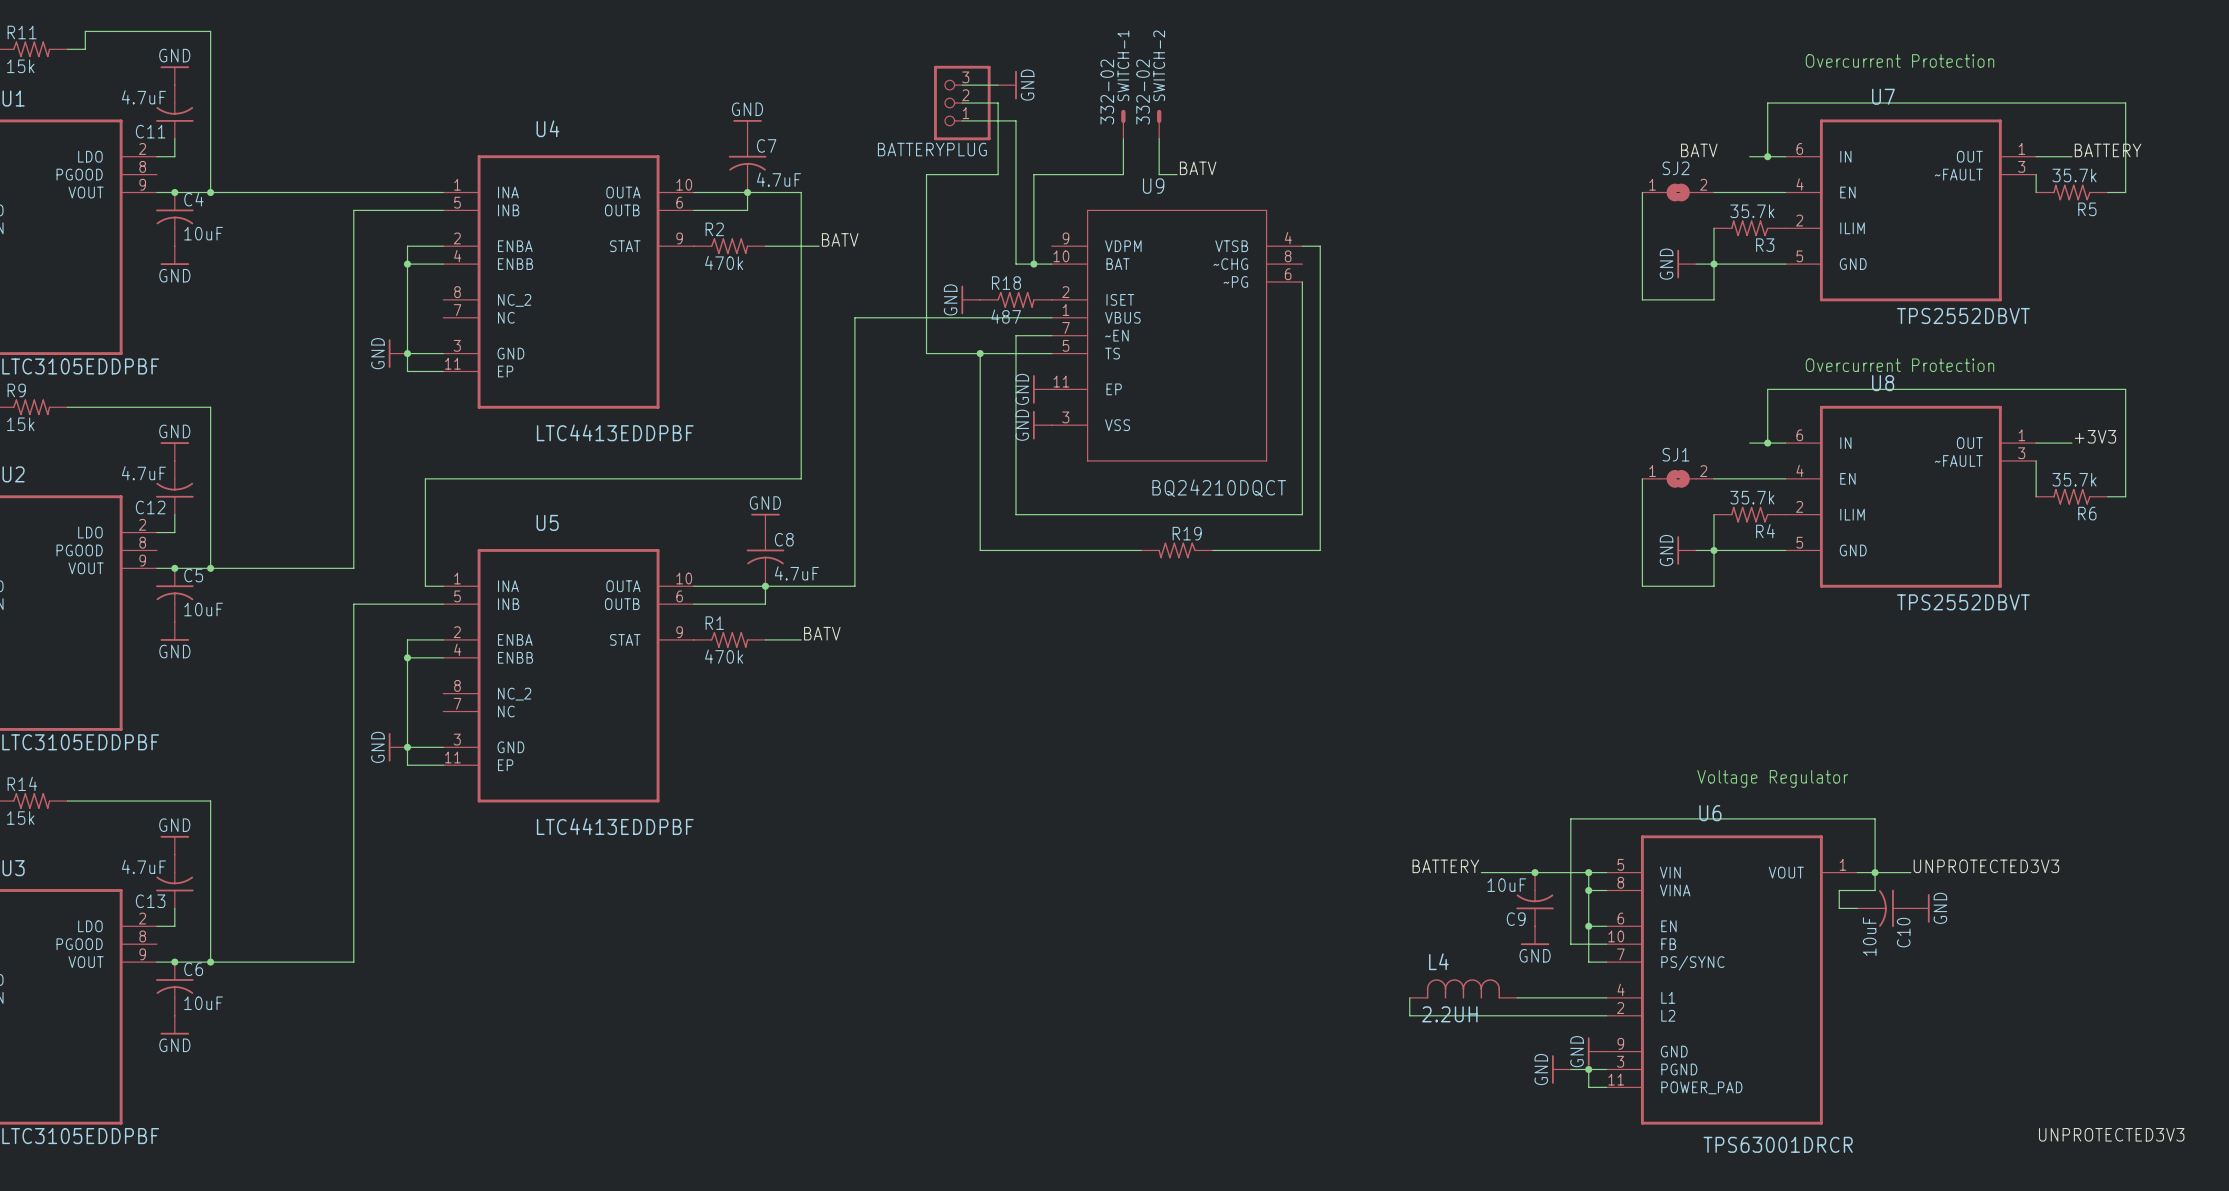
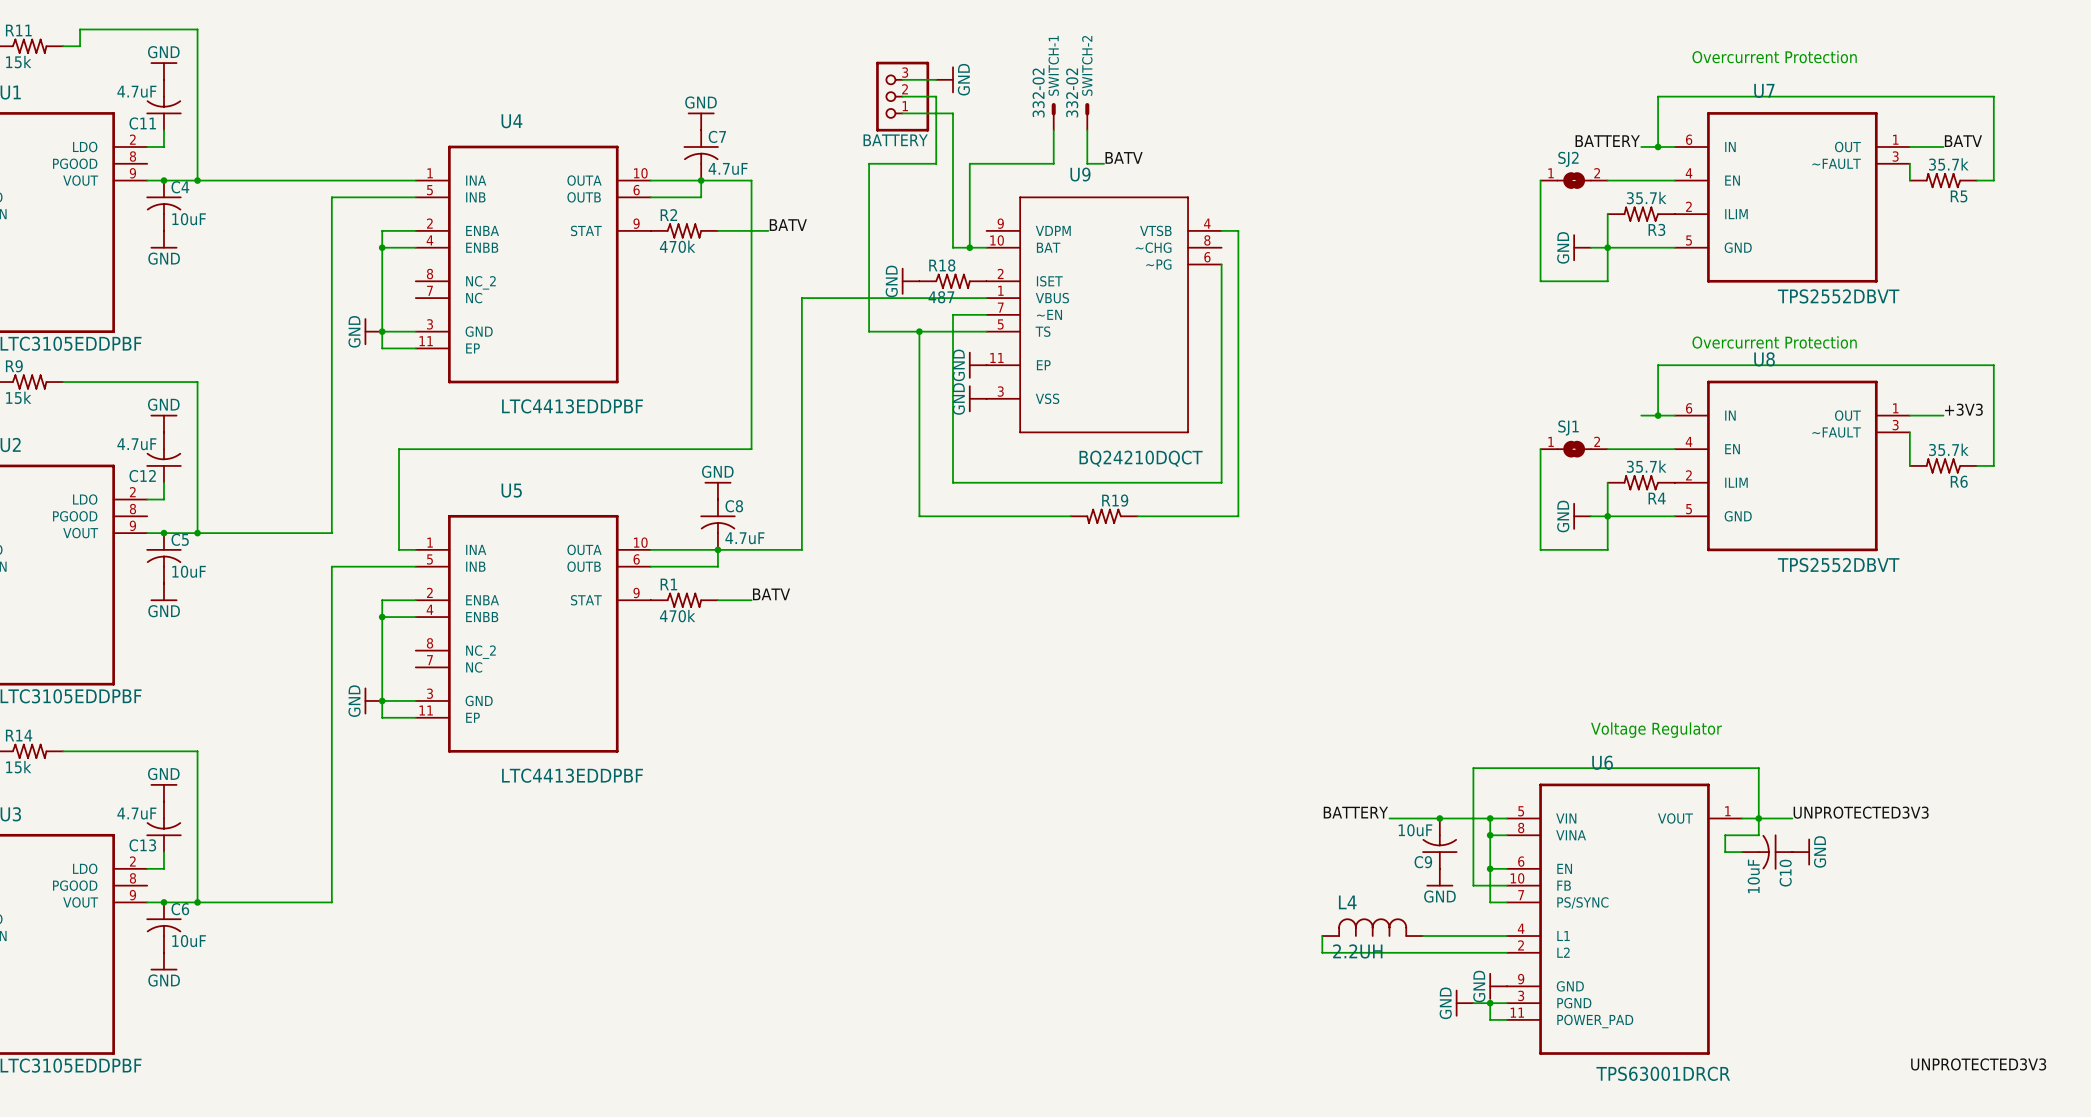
BATTERYPLUG name: BATTERYPLUG (932, 149) -> BATTERY (895, 140)
label: BATV (1699, 150) -> BATTERY (1607, 141)
label: BATTERY (2108, 150) -> BATV (1963, 141)

